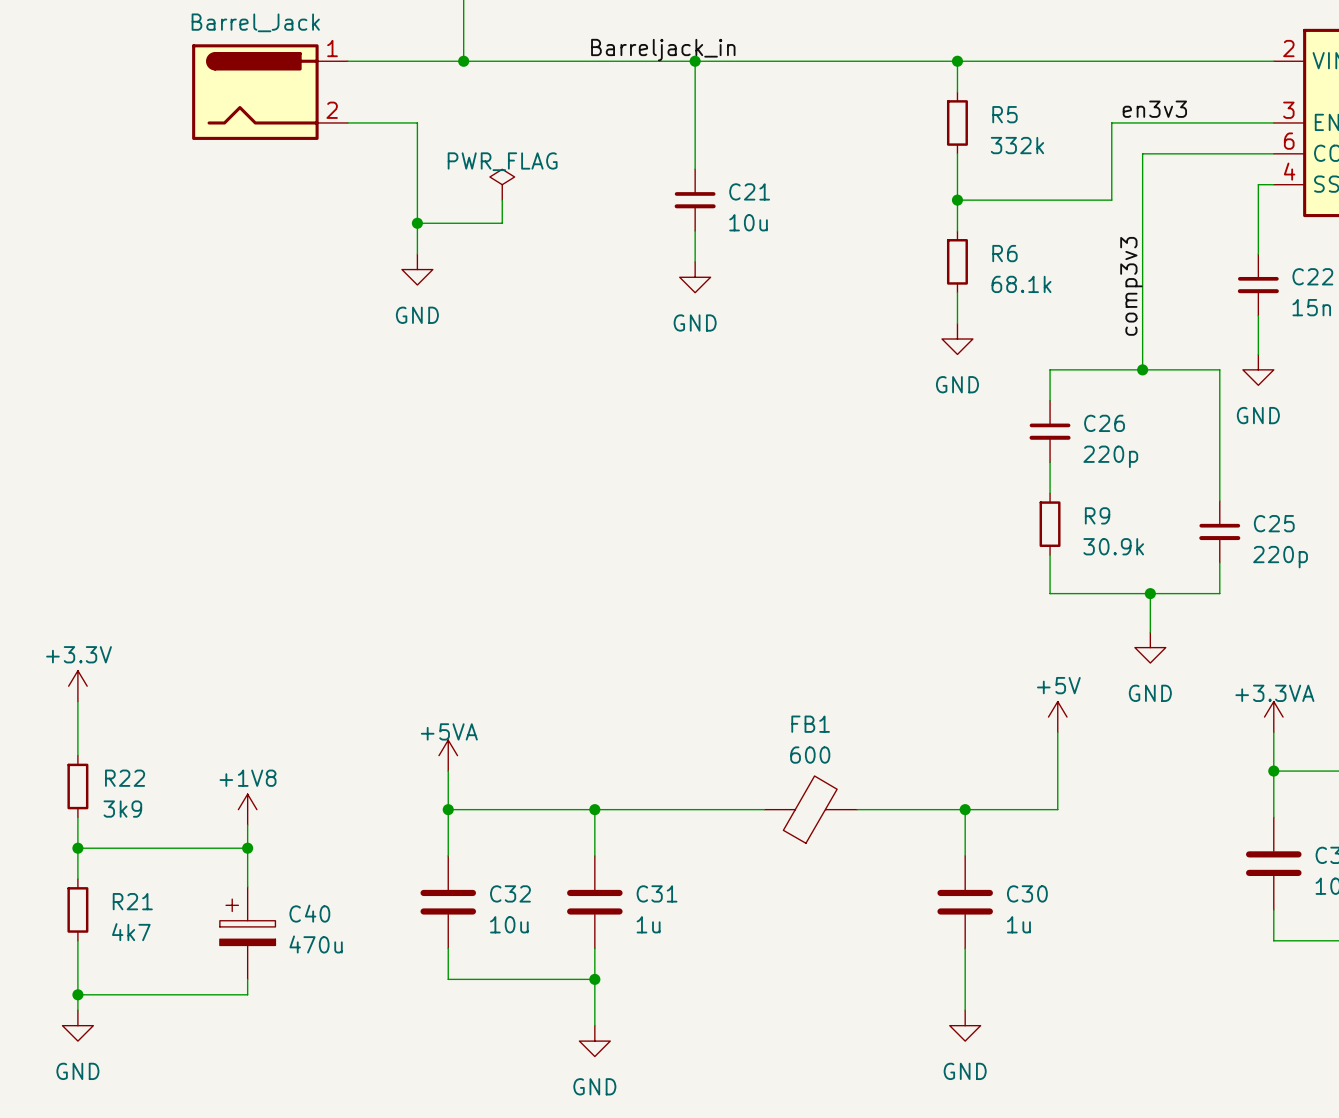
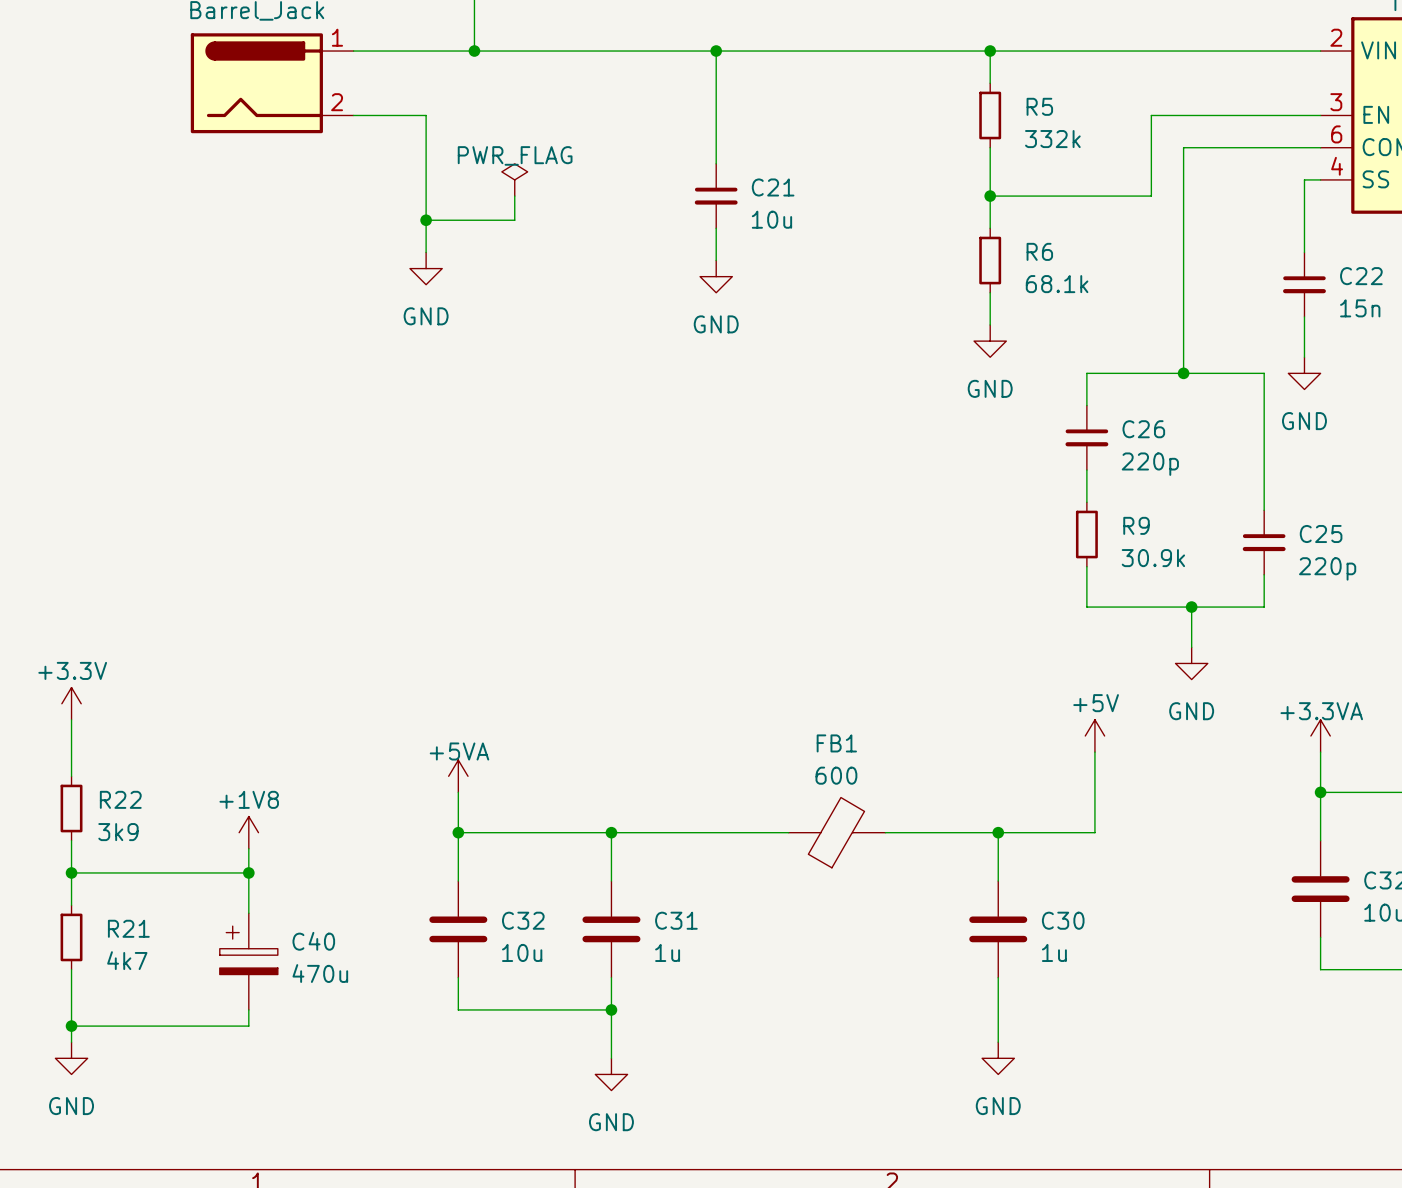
label: Barreljack_in (663, 50) -> none
label: en3v3 (1154, 109) -> none
label: comp3v3 (1131, 286) -> none

